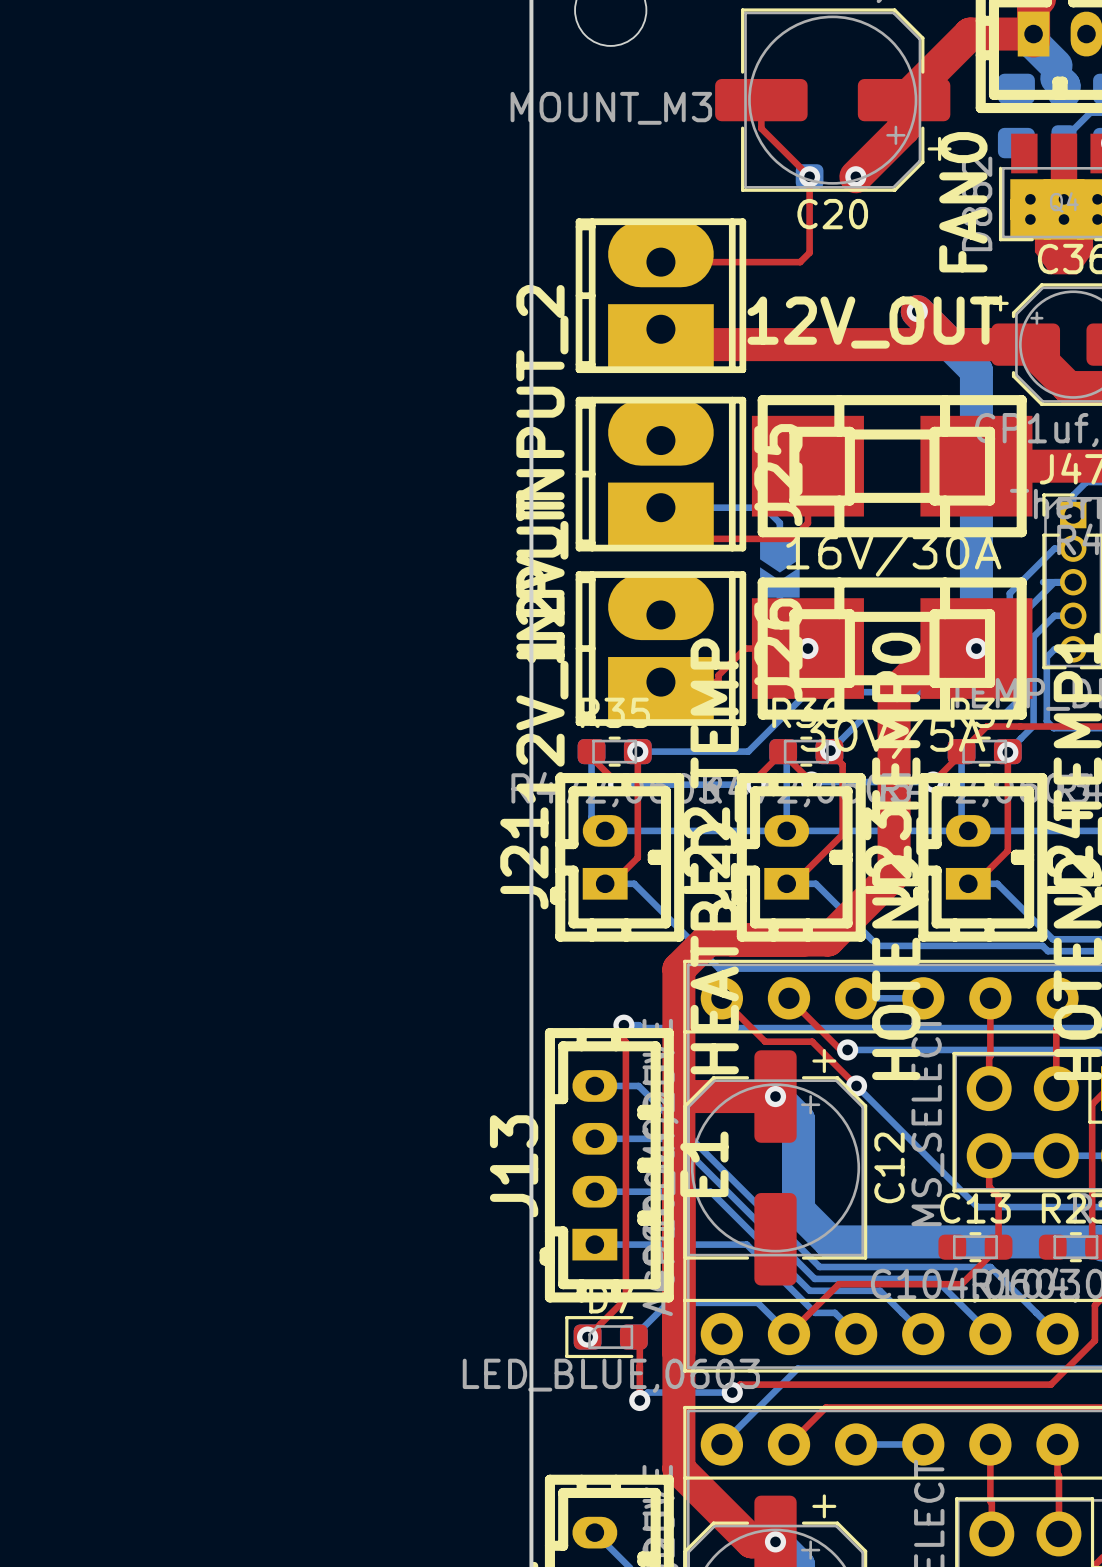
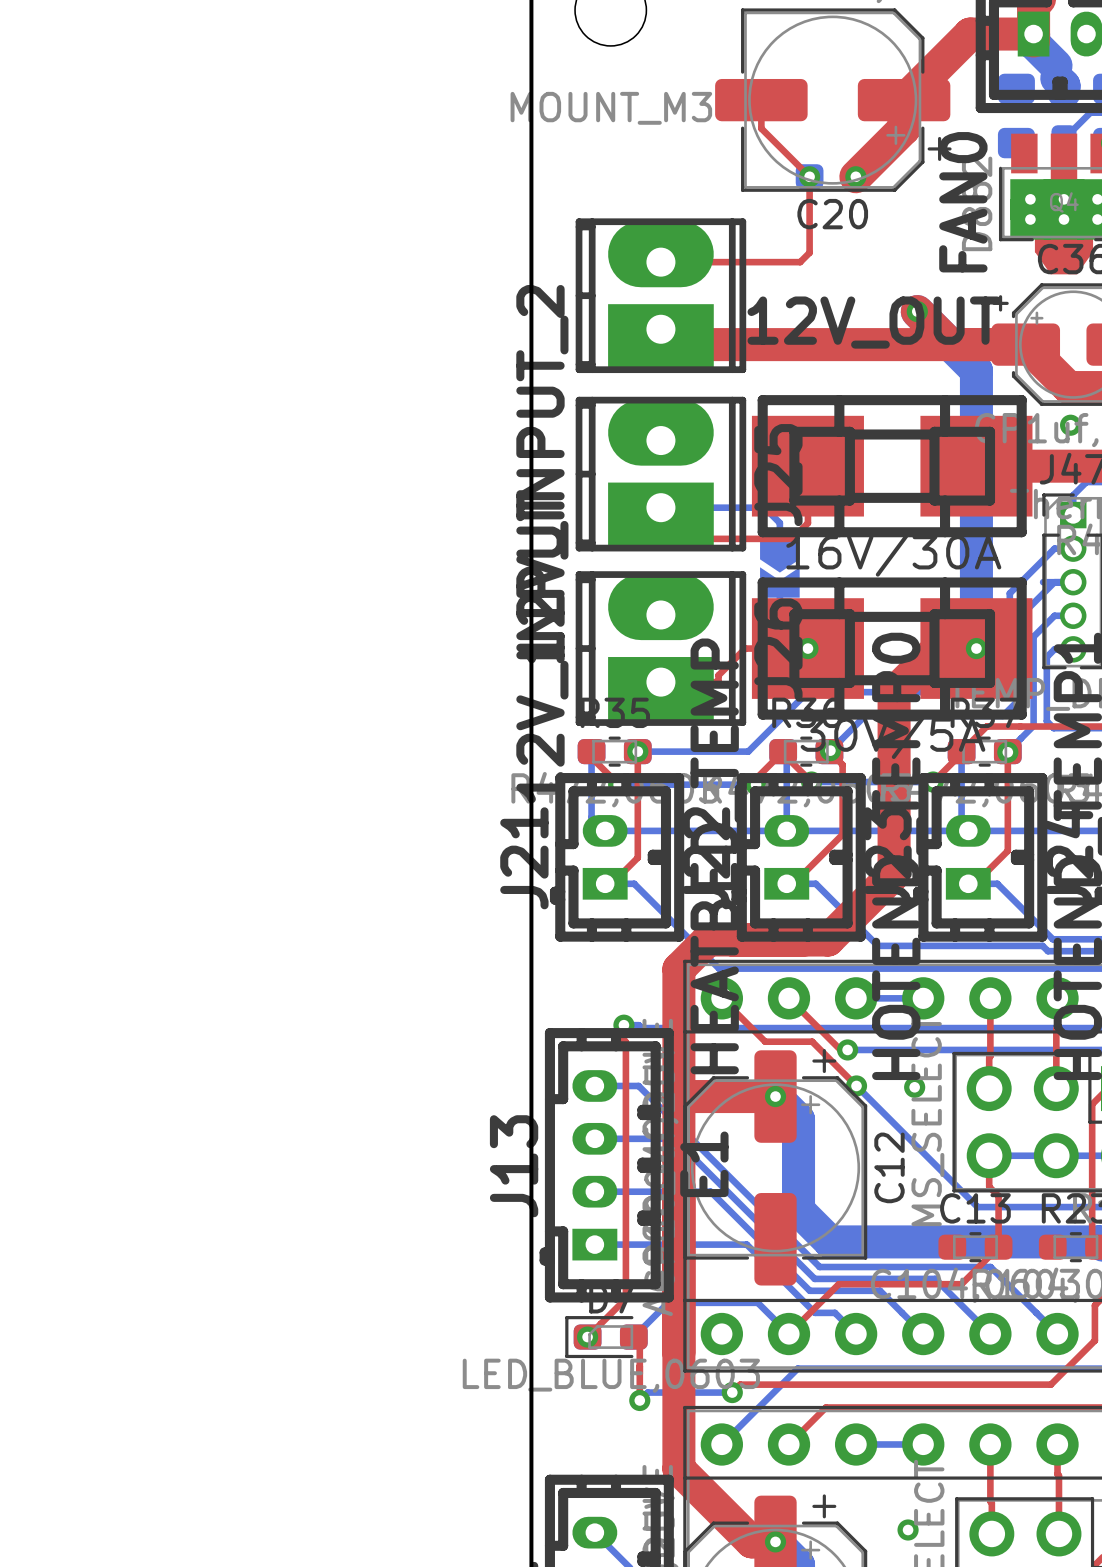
via: none -> (1070, 425)
via: none -> (914, 1087)
via: none -> (908, 1529)

